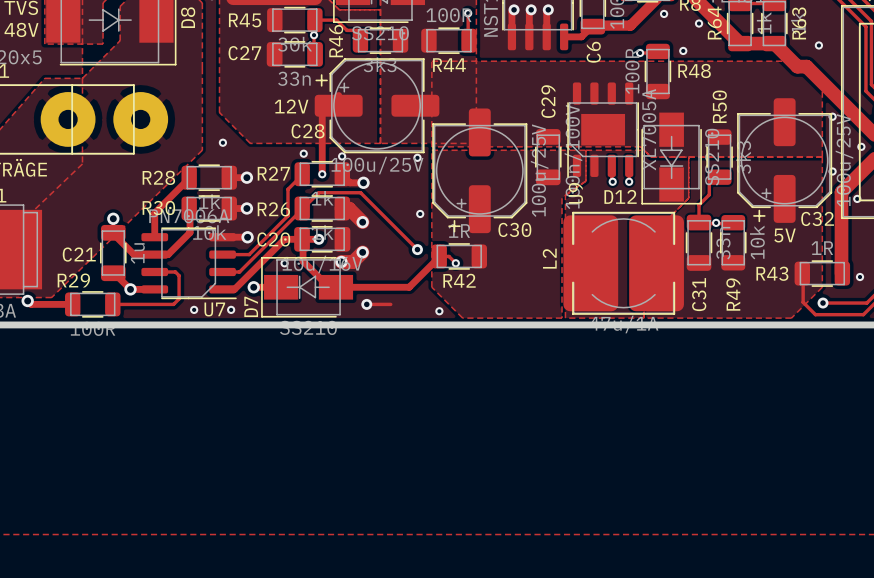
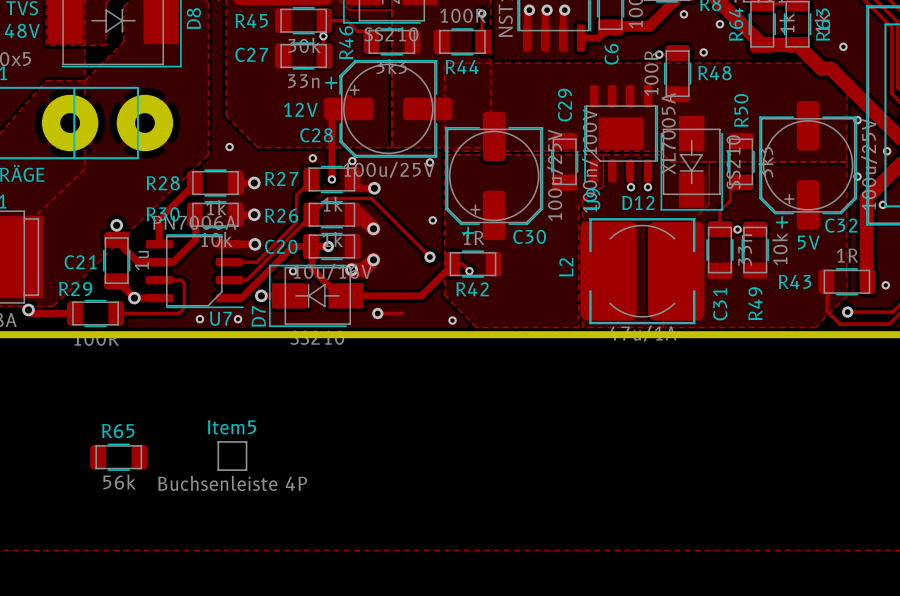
Item5: none -> Buchsenleiste 4P (232, 456)
R65: none -> 56k (118, 457)

